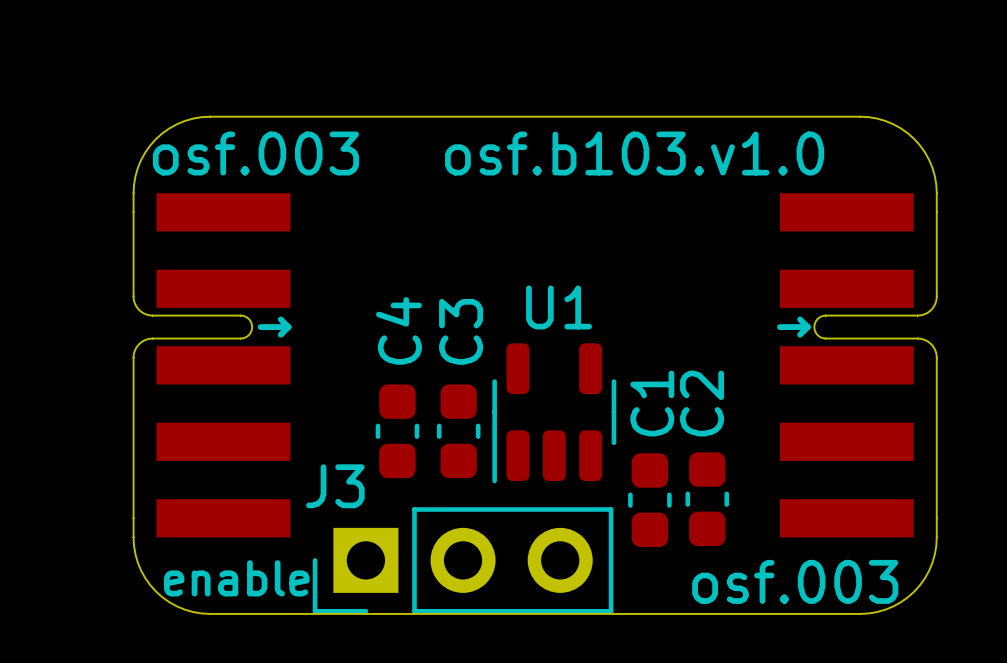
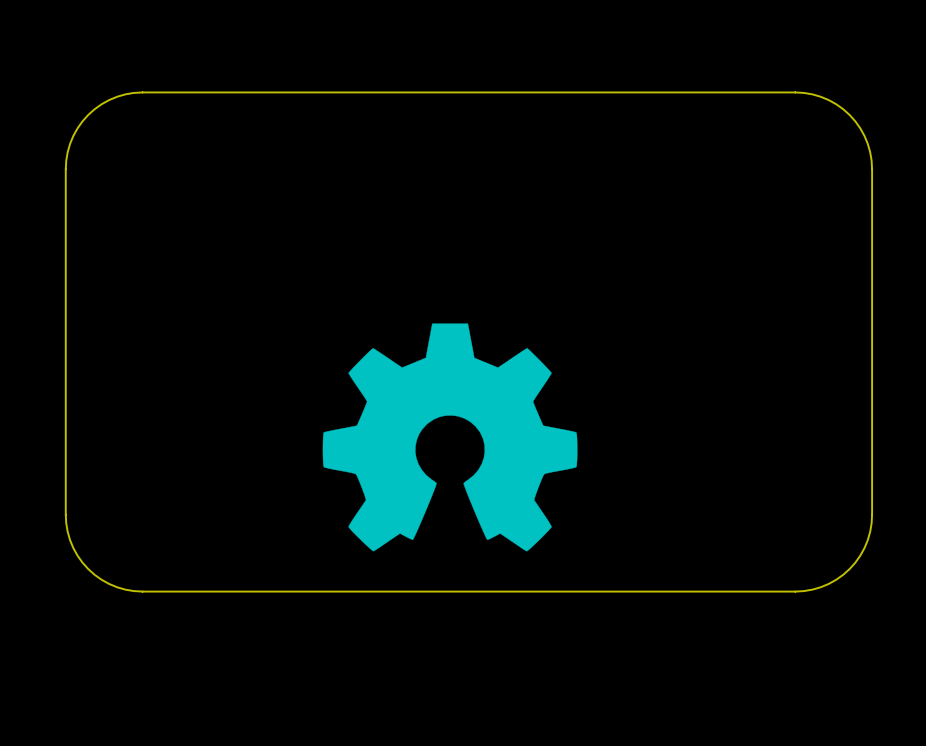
text: osf.003 (255, 153) -> none
text: osf.b103.v1.0 (634, 153) -> none
board edge: none -> (65, 188) (65, 495)
board edge: none -> (872, 188) (872, 495)
drawing: none -> [322, 323, 578, 552]
part: (212, 365) -> none
part: (857, 365) -> none
U1: (554, 413) -> none
C4: (397, 431) -> none
C3: (458, 431) -> none
C2: (707, 499) -> none
C1: (649, 500) -> none
J3: (463, 560) -> none
text: enable (236, 578) -> none
text: osf.003 (795, 581) -> none

